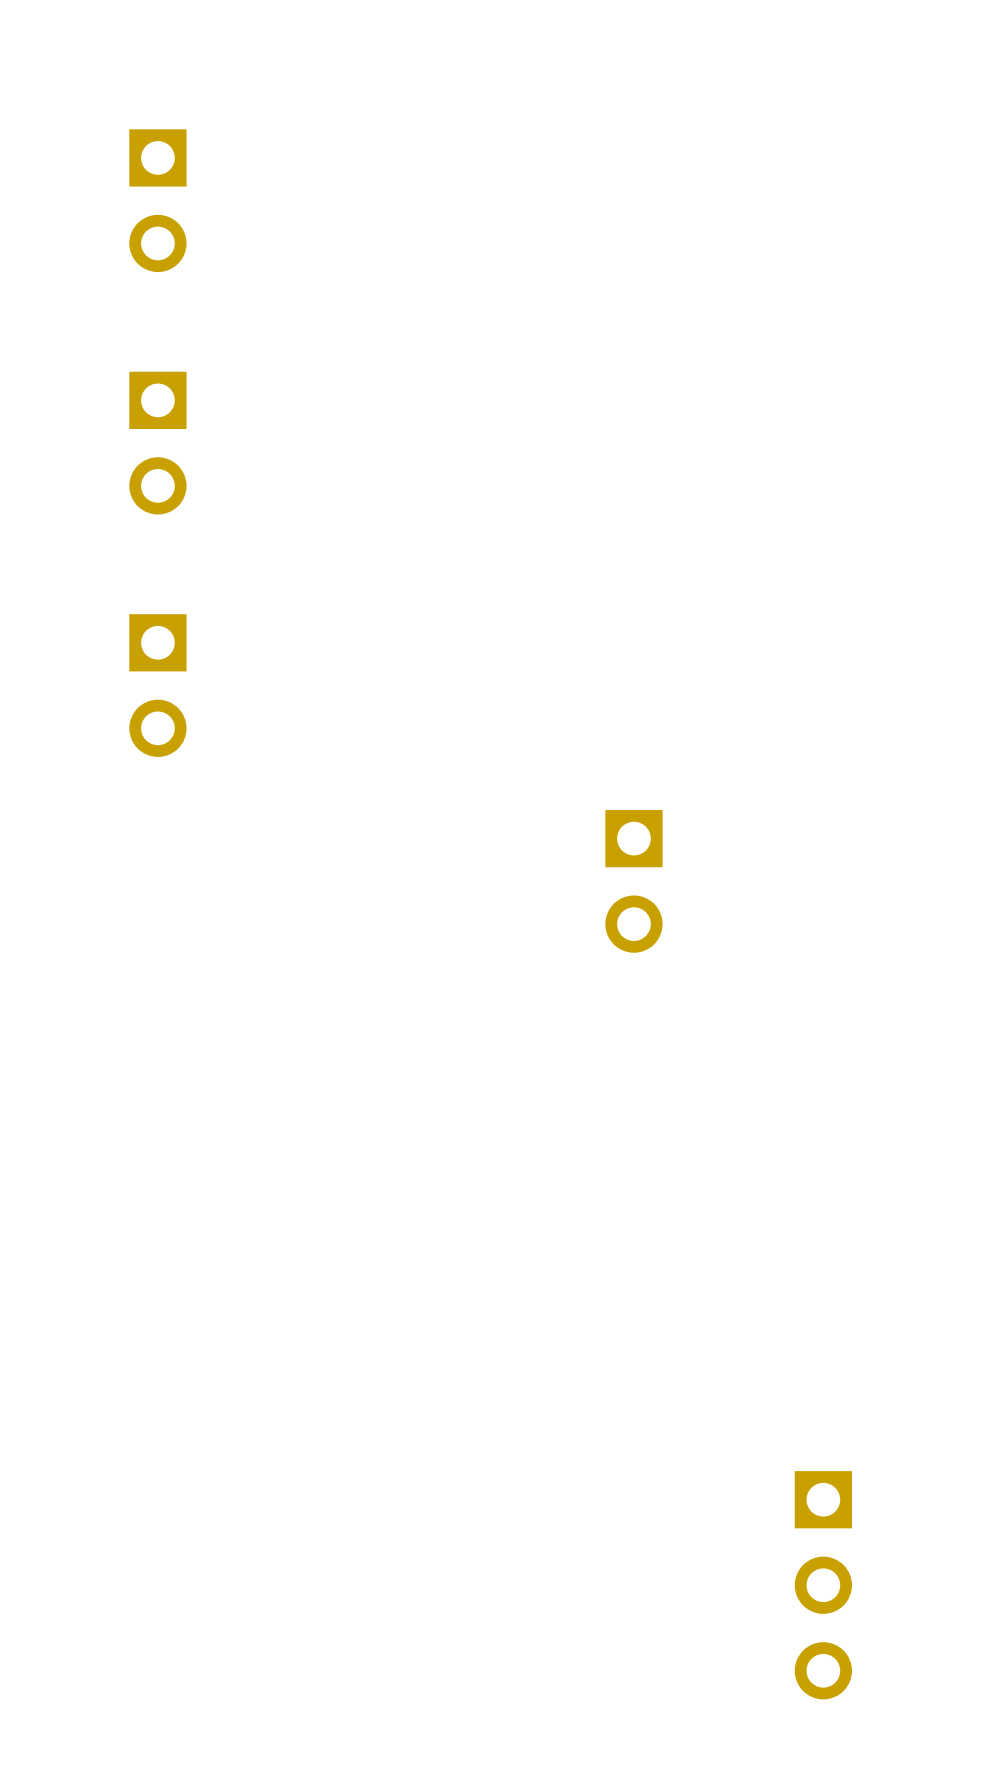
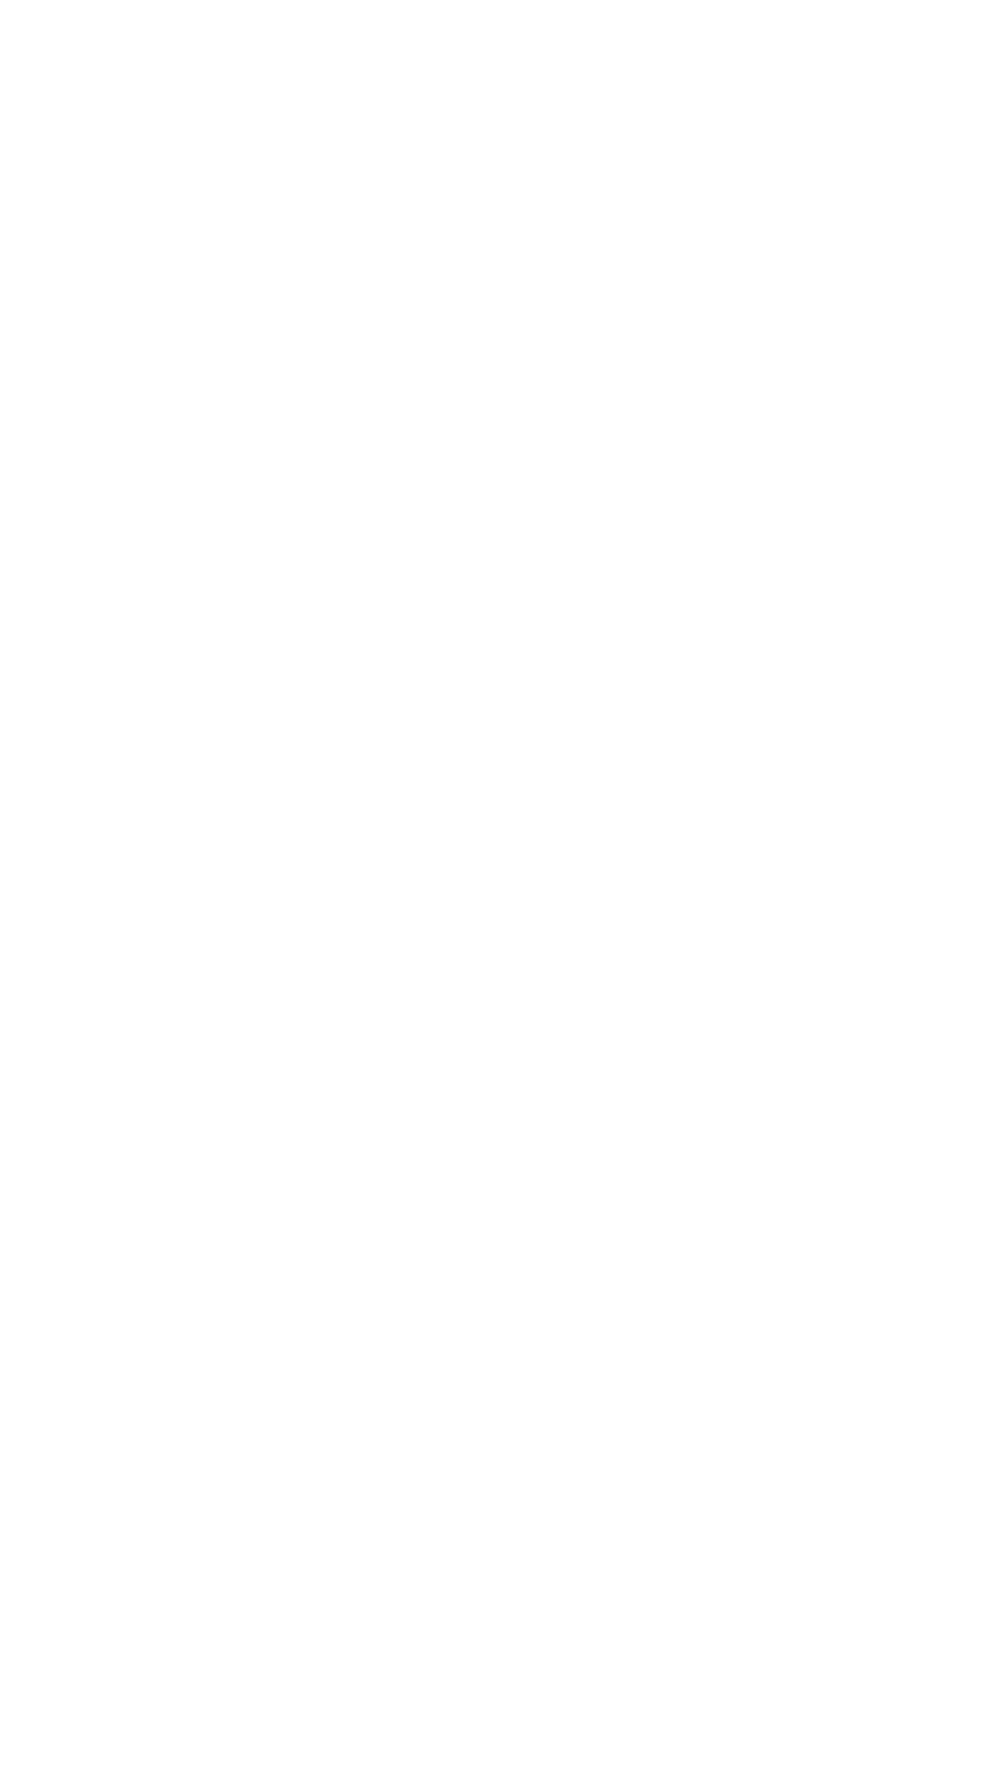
part: (157, 200) -> none
part: (157, 443) -> none
part: (157, 685) -> none
part: (633, 881) -> none
part: (823, 1585) -> none

